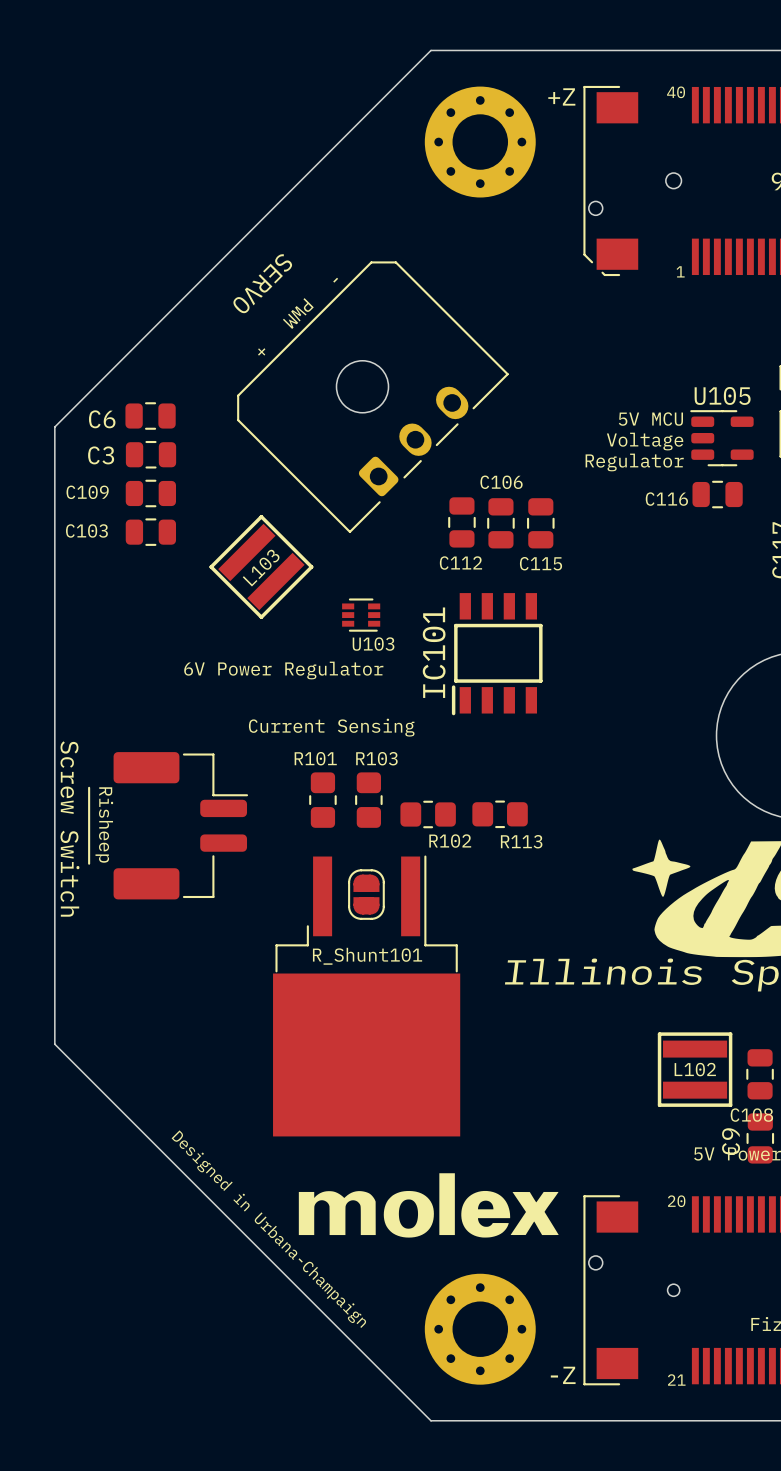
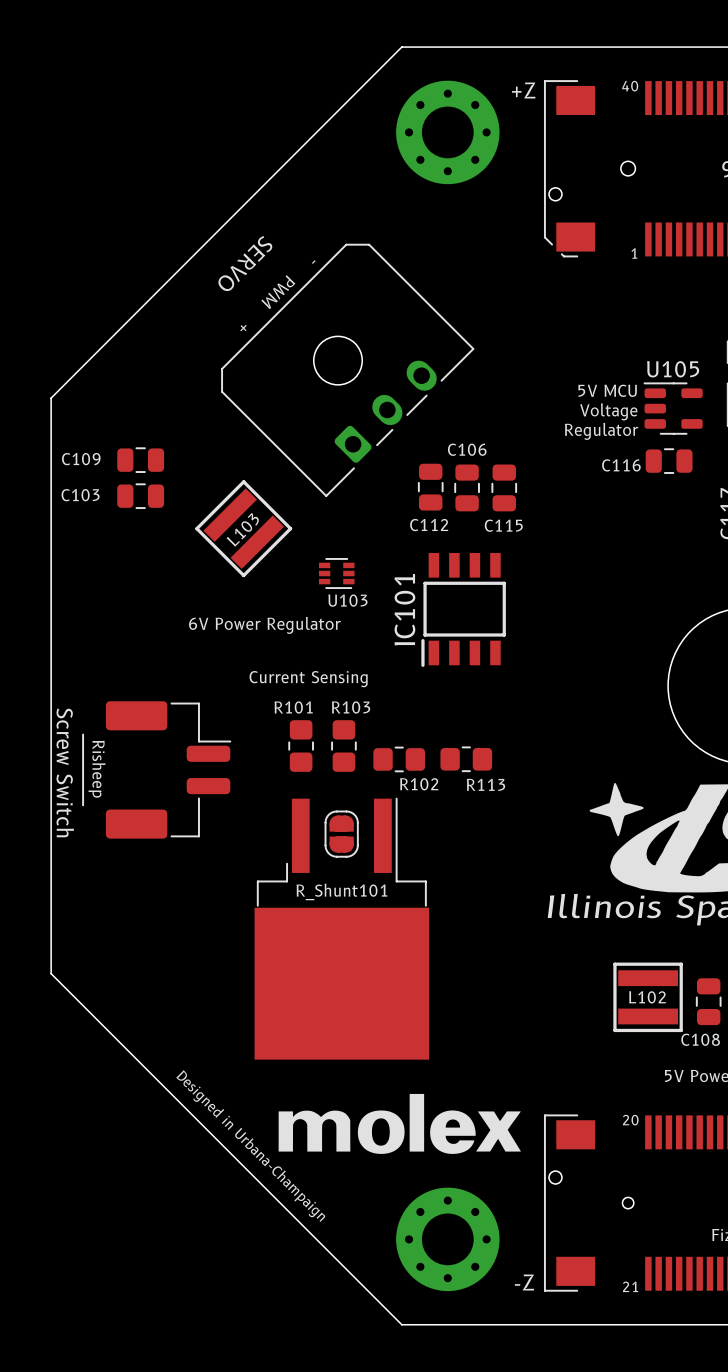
C6: (150, 416) -> none
C3: (151, 454) -> none
C9: (760, 1138) -> none

